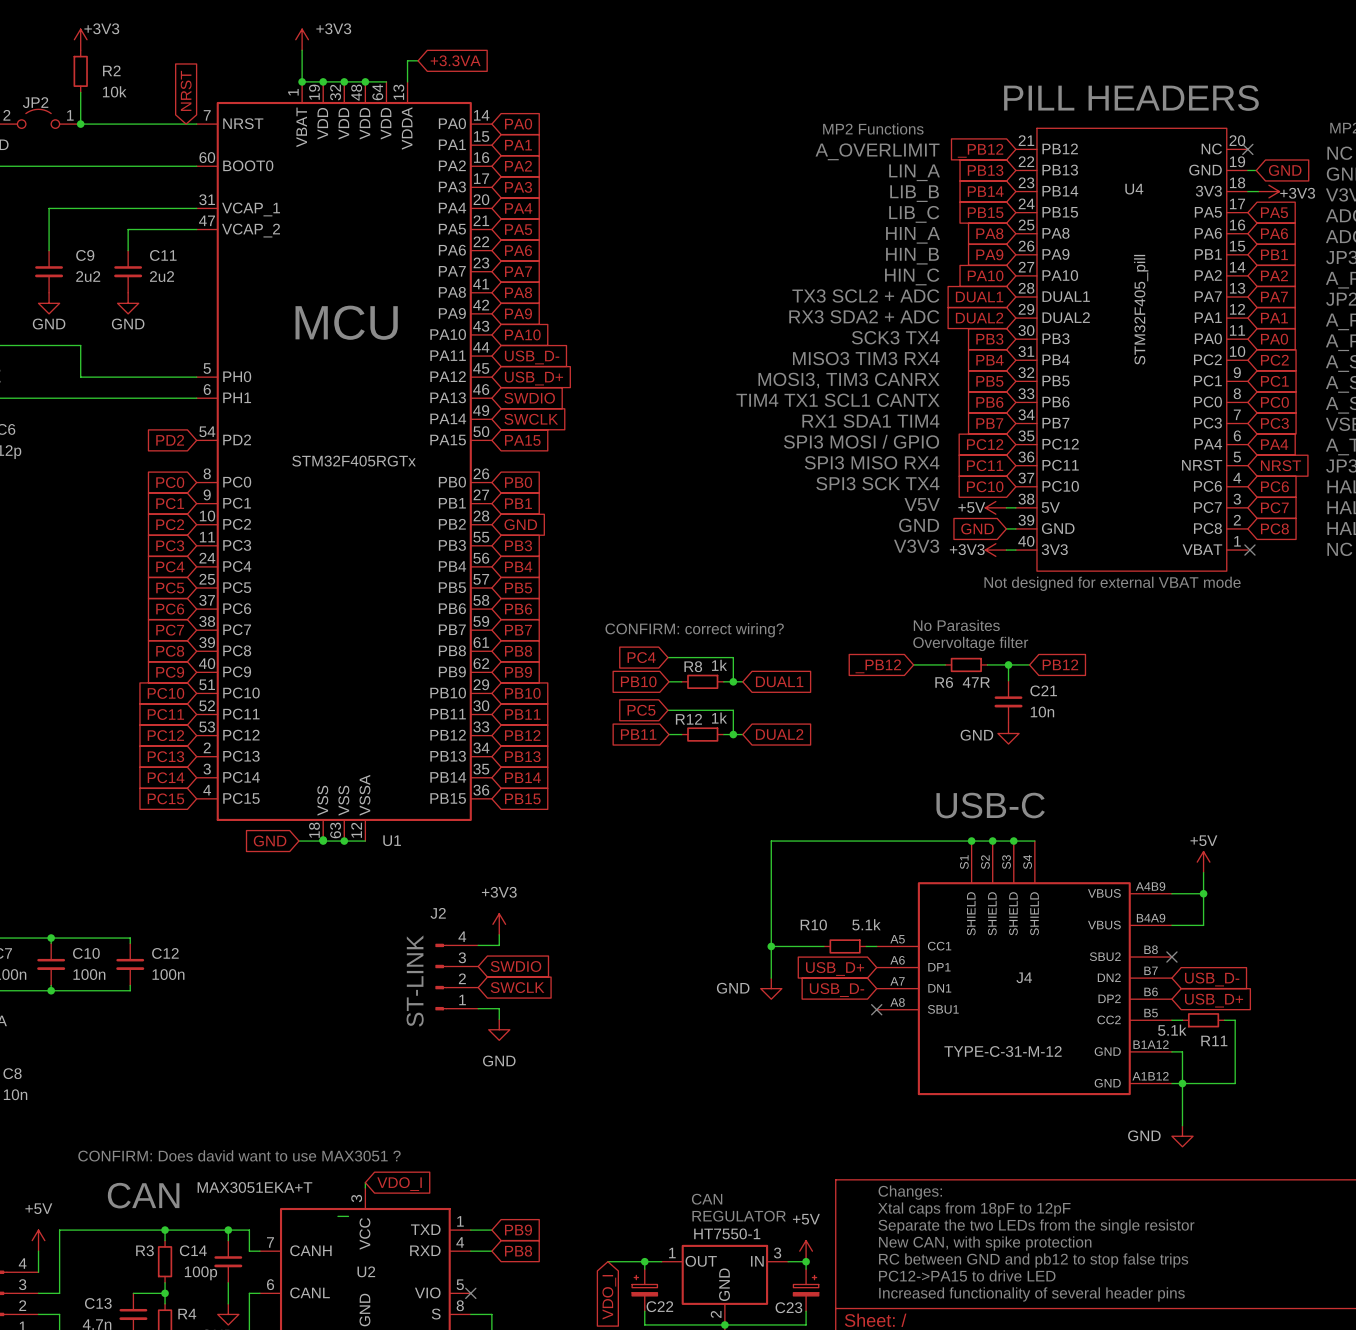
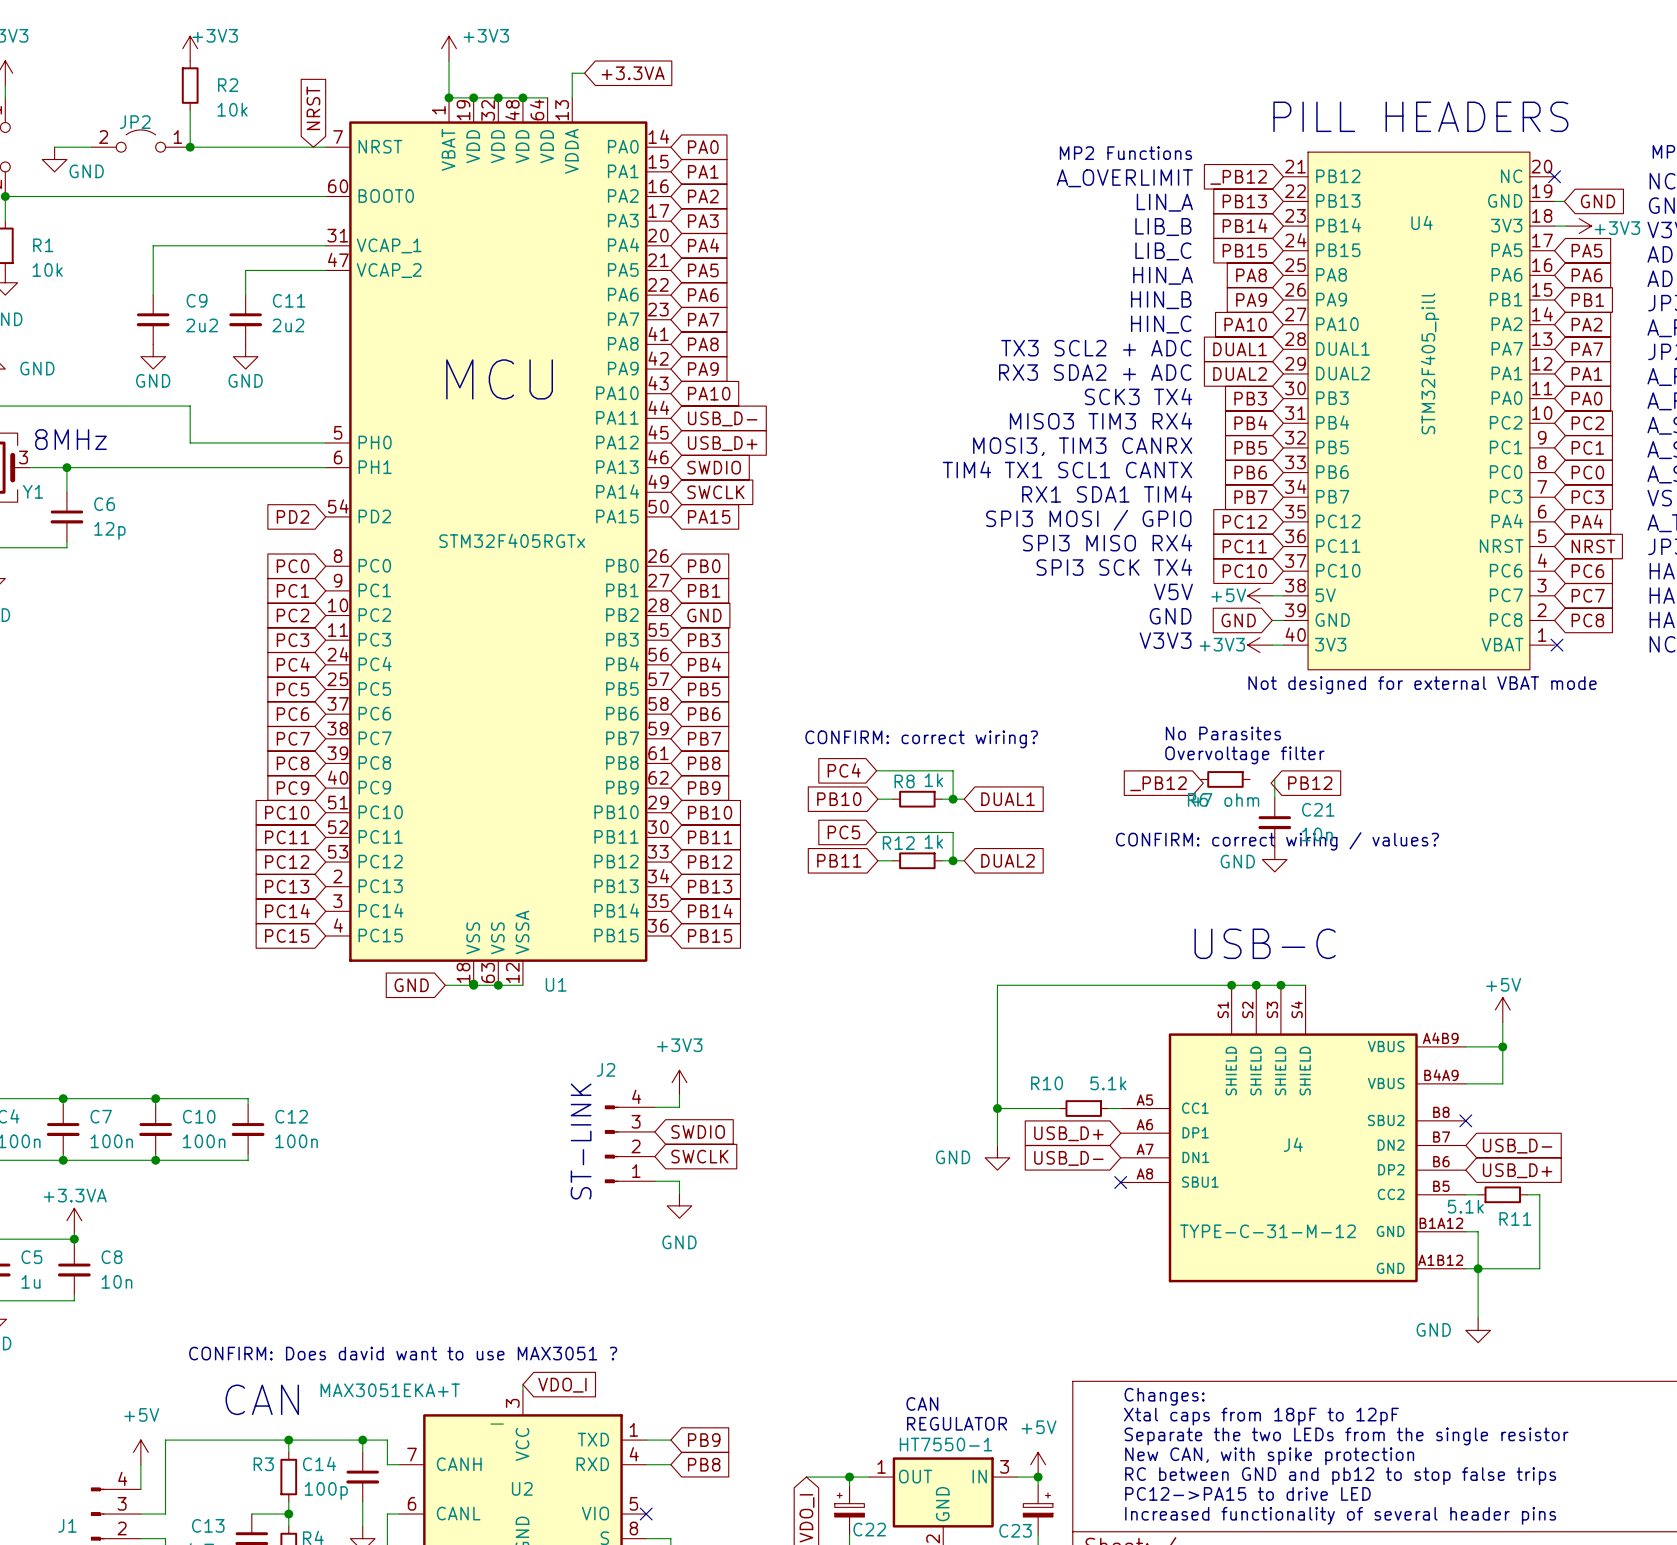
wire: (913, 664) (945, 664) -> none
wire: (987, 664) (1029, 664) -> none
junction: (1008, 664) -> none
global label position: PB12 (1060, 664) -> PB12 (1310, 783)
global label position: _PB12 (878, 666) -> _PB12 (1158, 783)
R6 value: 47R (976, 682) -> 47 ohm (1225, 799)
text: none -> CONFIRM: correct wiring / values? (1277, 841)

